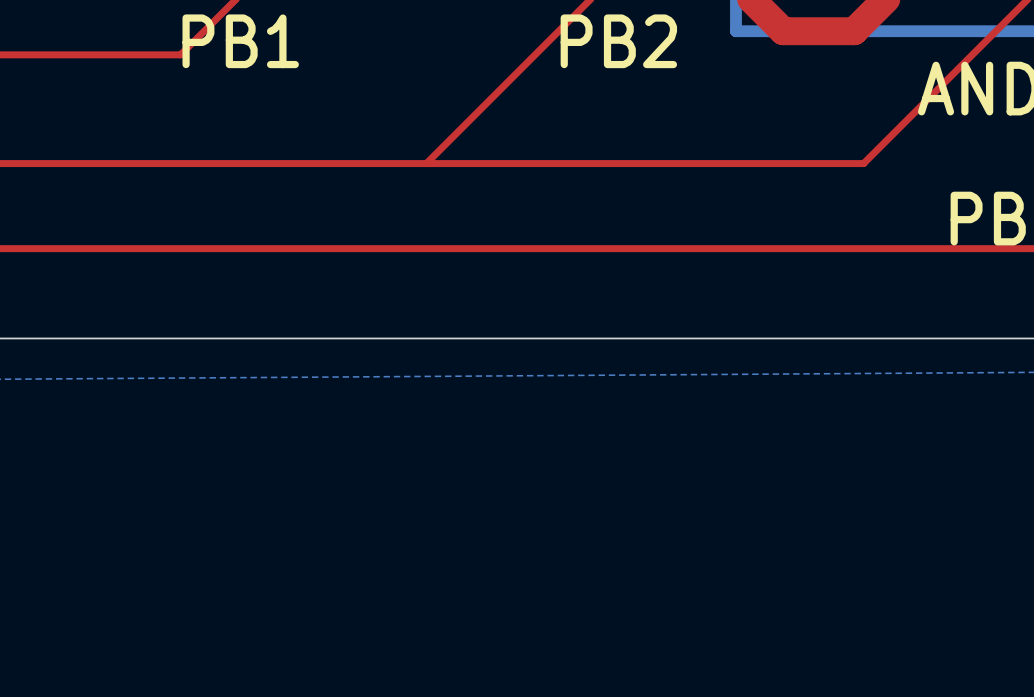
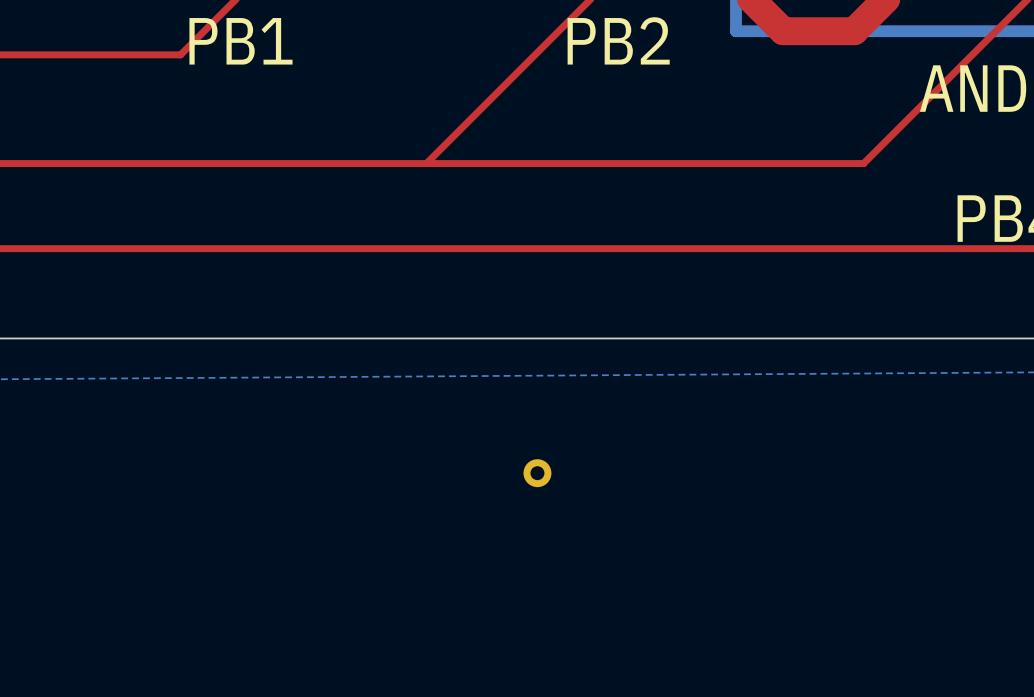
part: none -> (537, 473)

